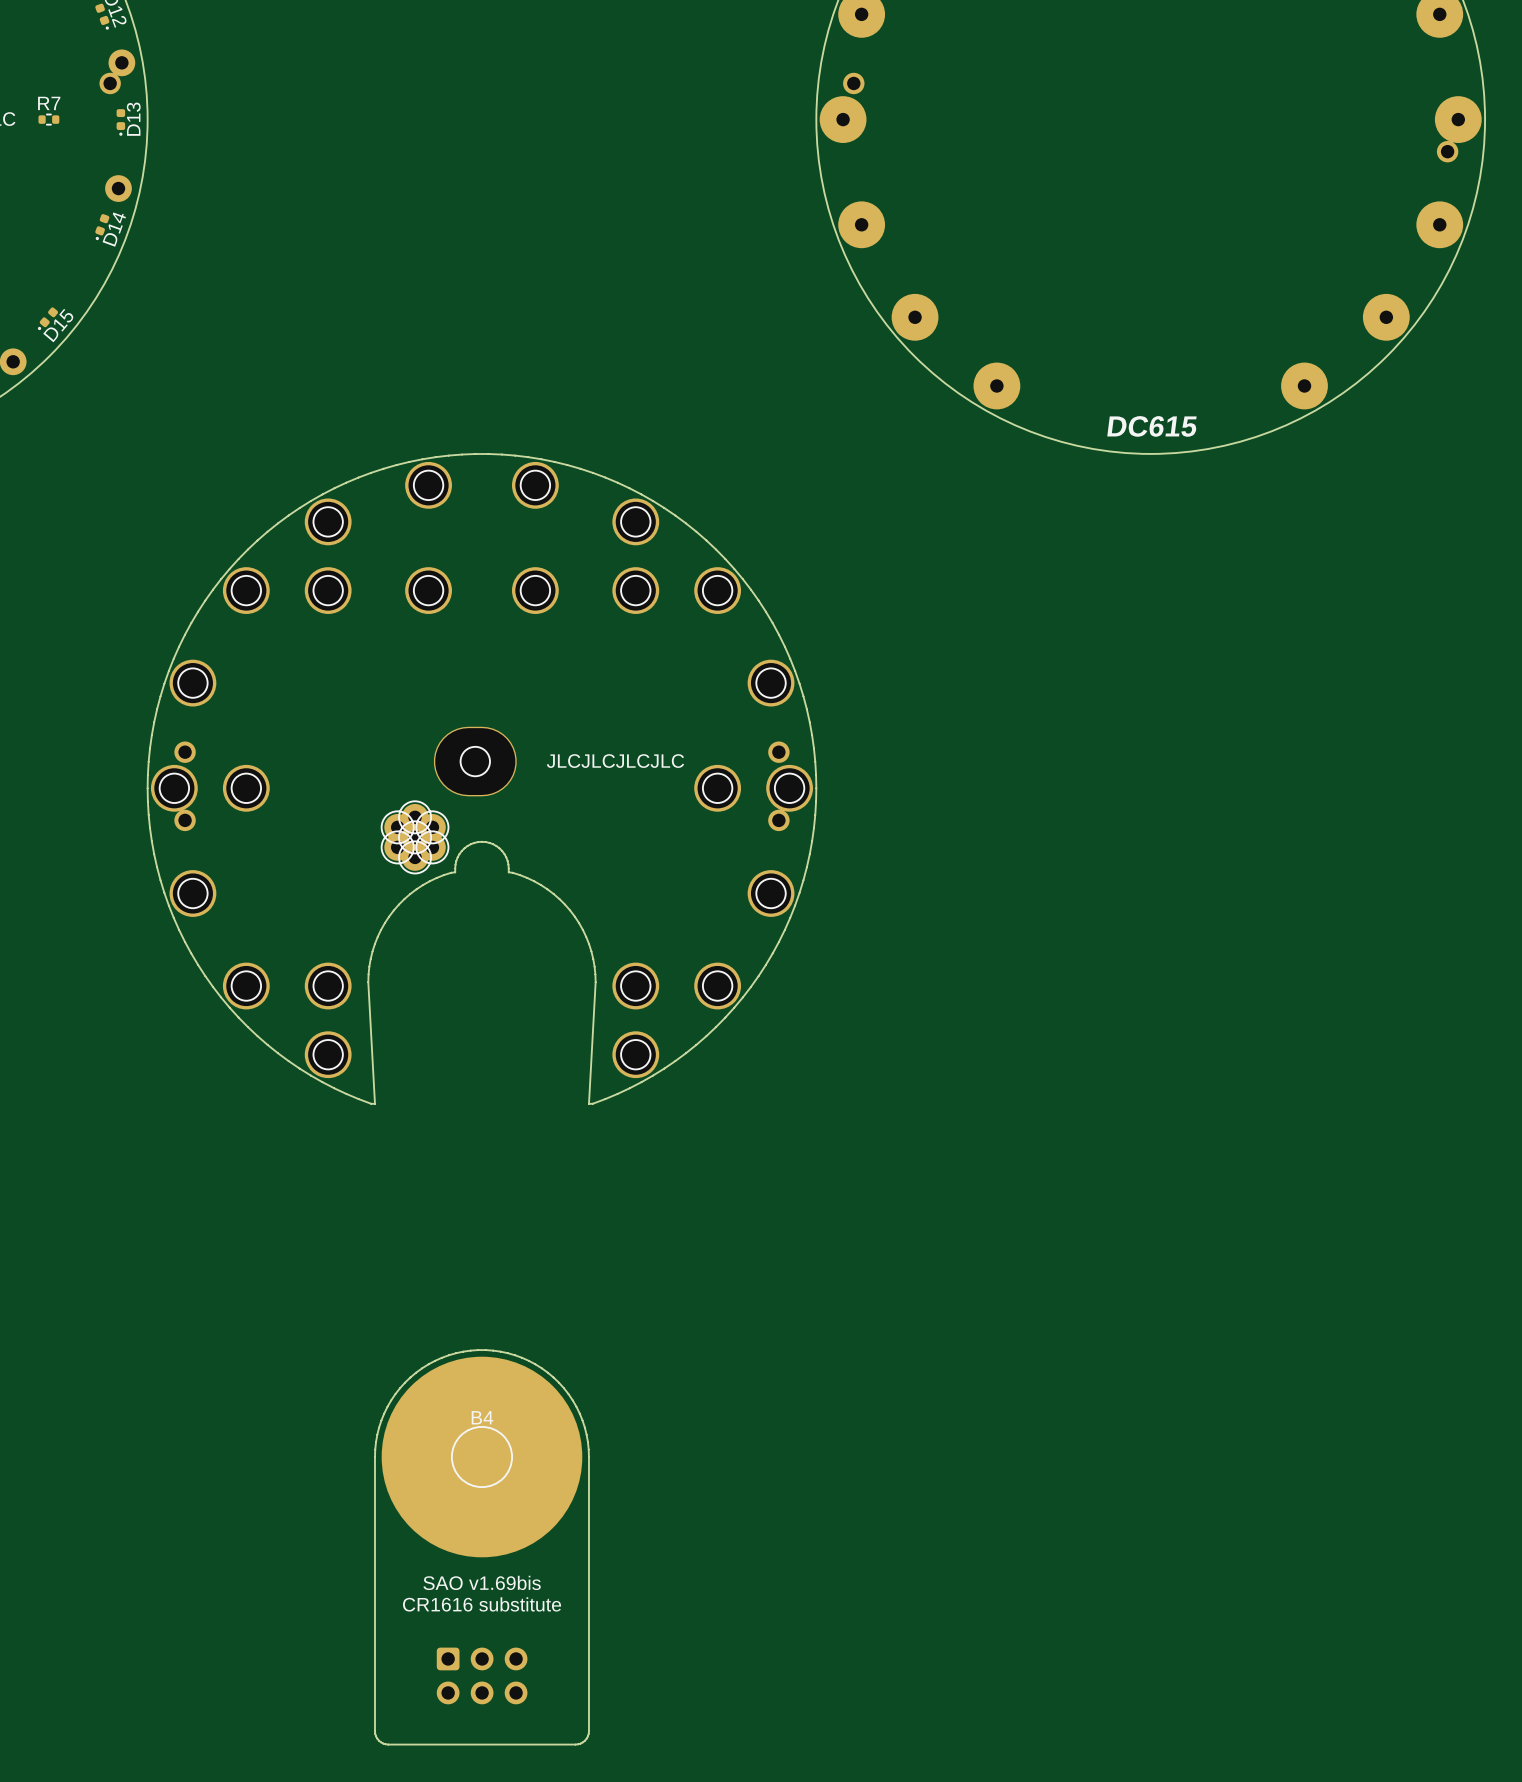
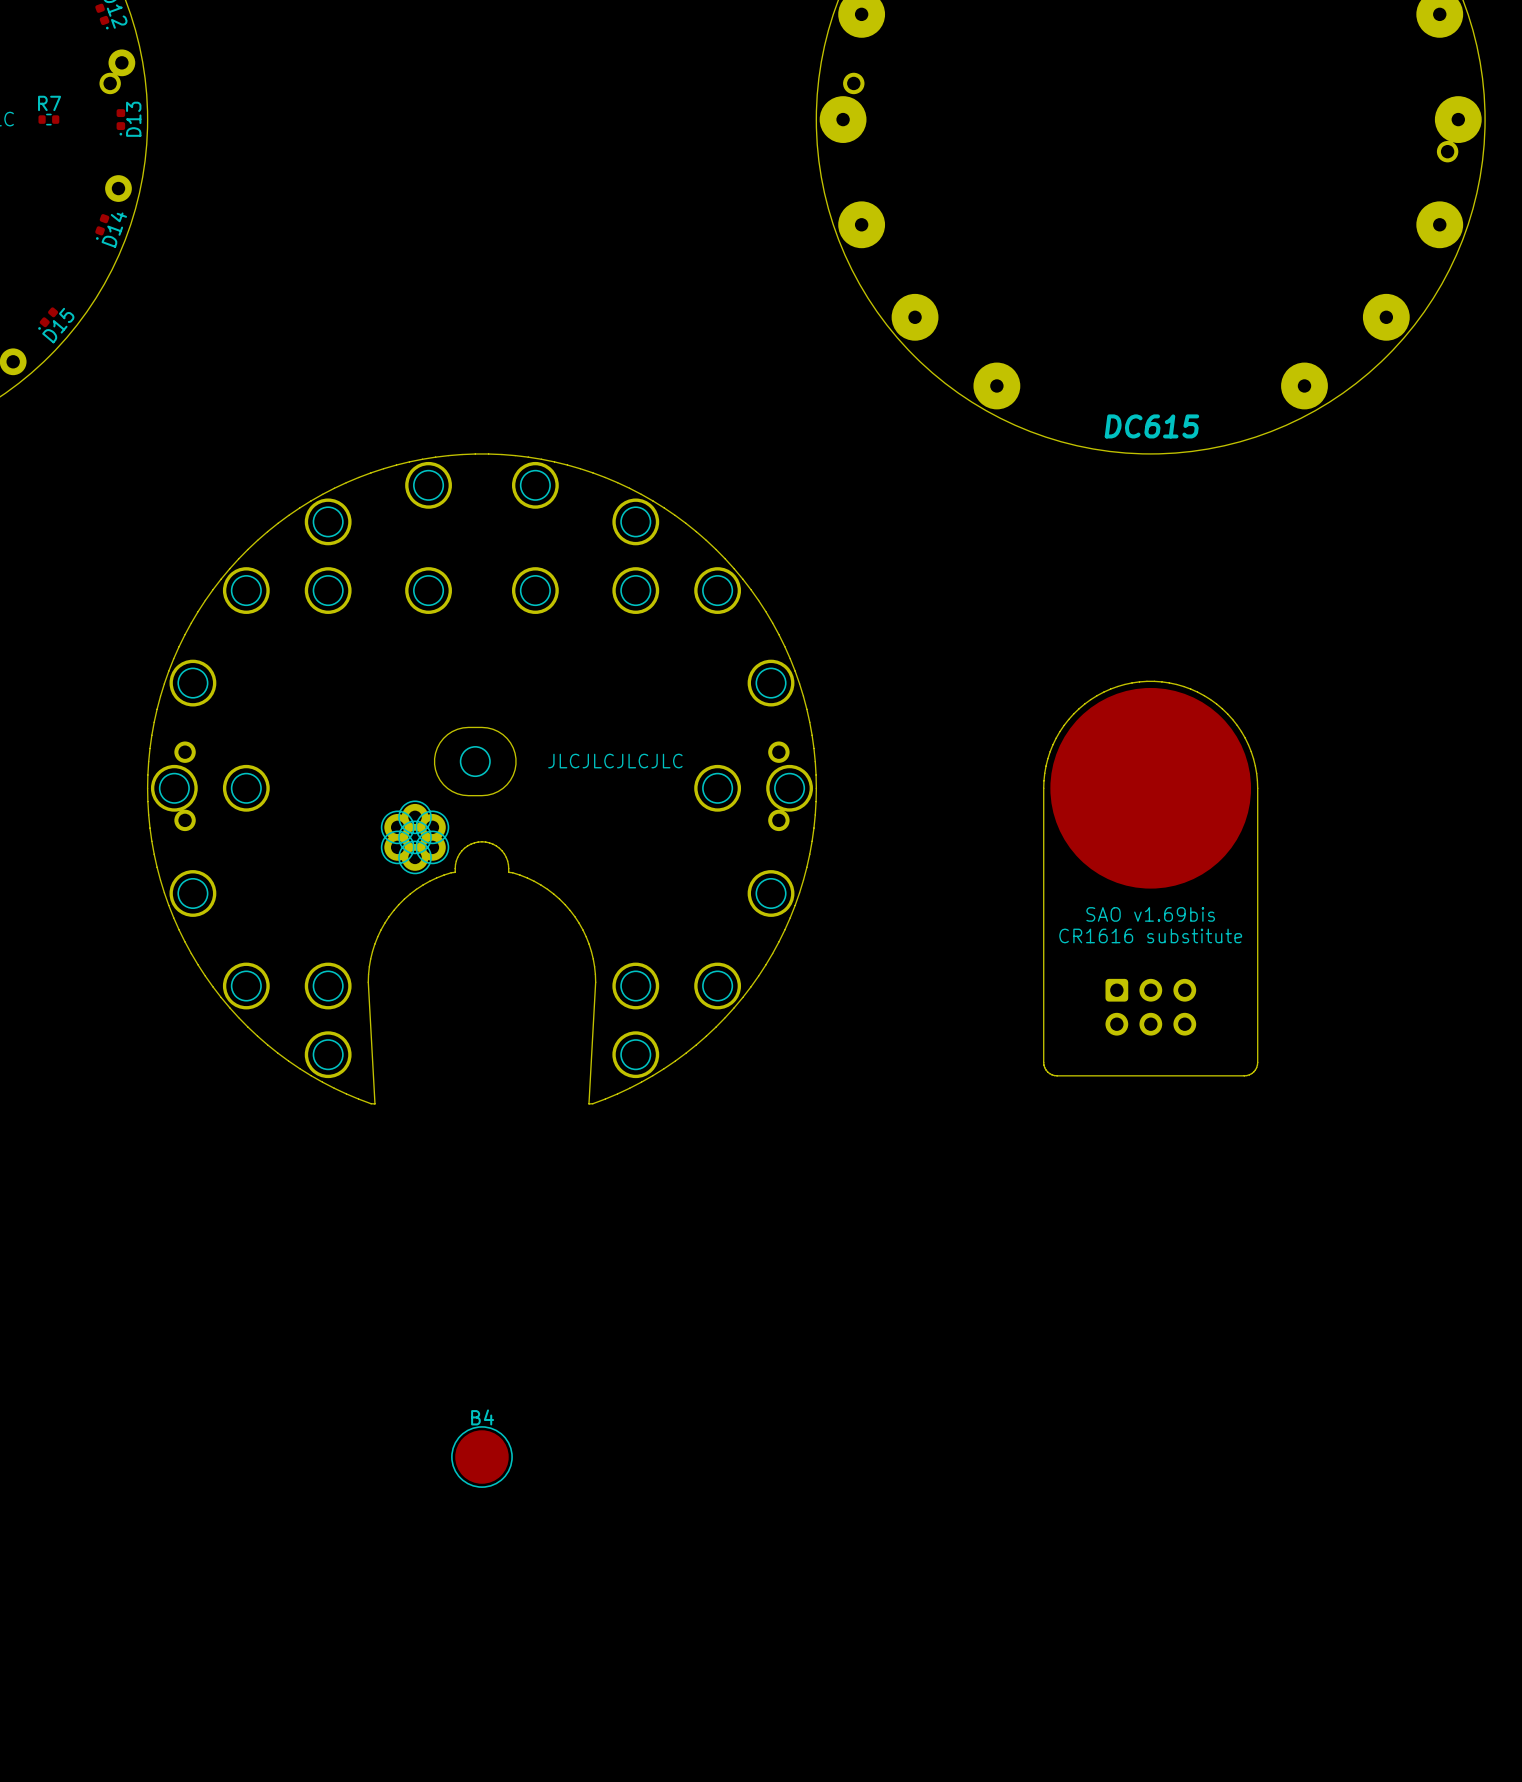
board edge: none -> (1146, 681) (1117, 686) (1097, 695) (1084, 703) (1068, 719) (1059, 731) (1047, 758) (1043, 788) (1043, 1065) (1047, 1071) (1057, 1075) (1246, 1075) (1255, 1069) (1257, 1062) (1257, 788) (1253, 758) (1248, 744) (1237, 725) (1222, 708) (1210, 699) (1183, 686) (1169, 682) (1146, 681)
part: none -> (1150, 788)
text: none -> SAO v1.69bis (1150, 914)
text: none -> CR1616 substitute (1150, 935)
part: none -> (1150, 1007)
board edge: (478, 1350) (463, 1351) (441, 1357) (416, 1372) (400, 1388) (391, 1400) (379, 1427) (374, 1457) (375, 1733) (380, 1742) (388, 1744) (578, 1744) (586, 1738) (588, 1731) (588, 1457) (584, 1427) (572, 1400) (563, 1388) (547, 1372) (528, 1360) (515, 1355) (500, 1351) (478, 1350) -> none
part: (481, 1457) -> none
text: SAO v1.69bis (482, 1582) -> none
text: CR1616 substitute (482, 1604) -> none
part: (482, 1675) -> none

